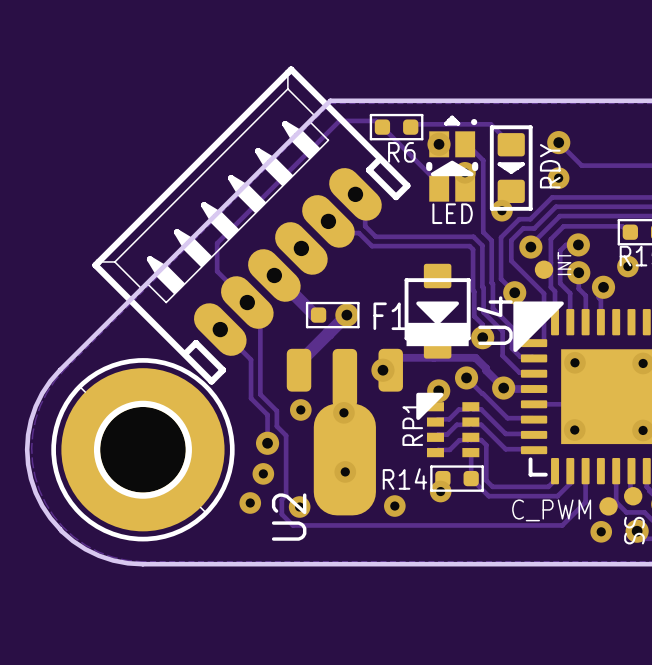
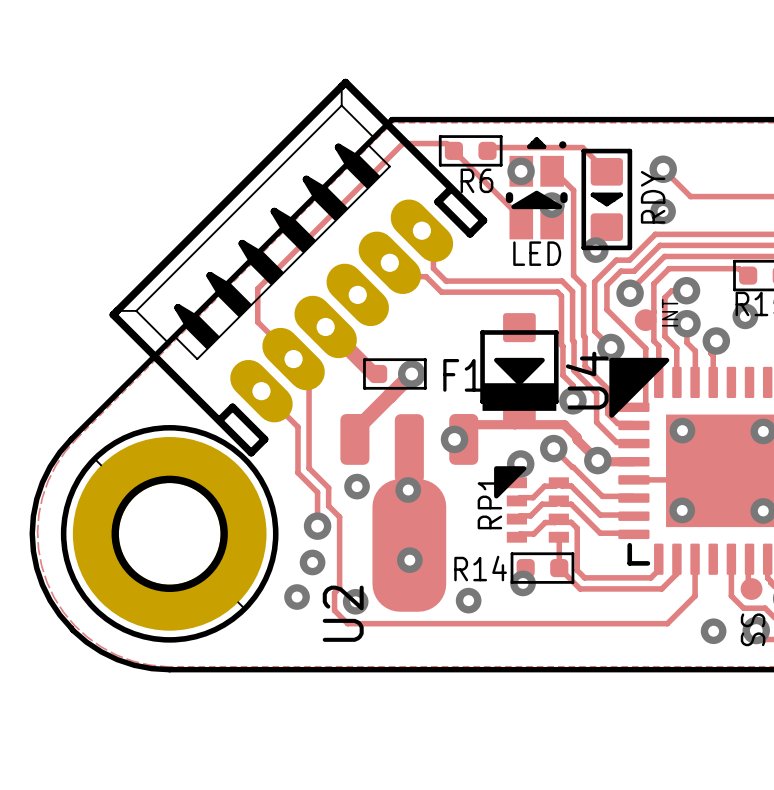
C_PWM: (608, 506) -> none

